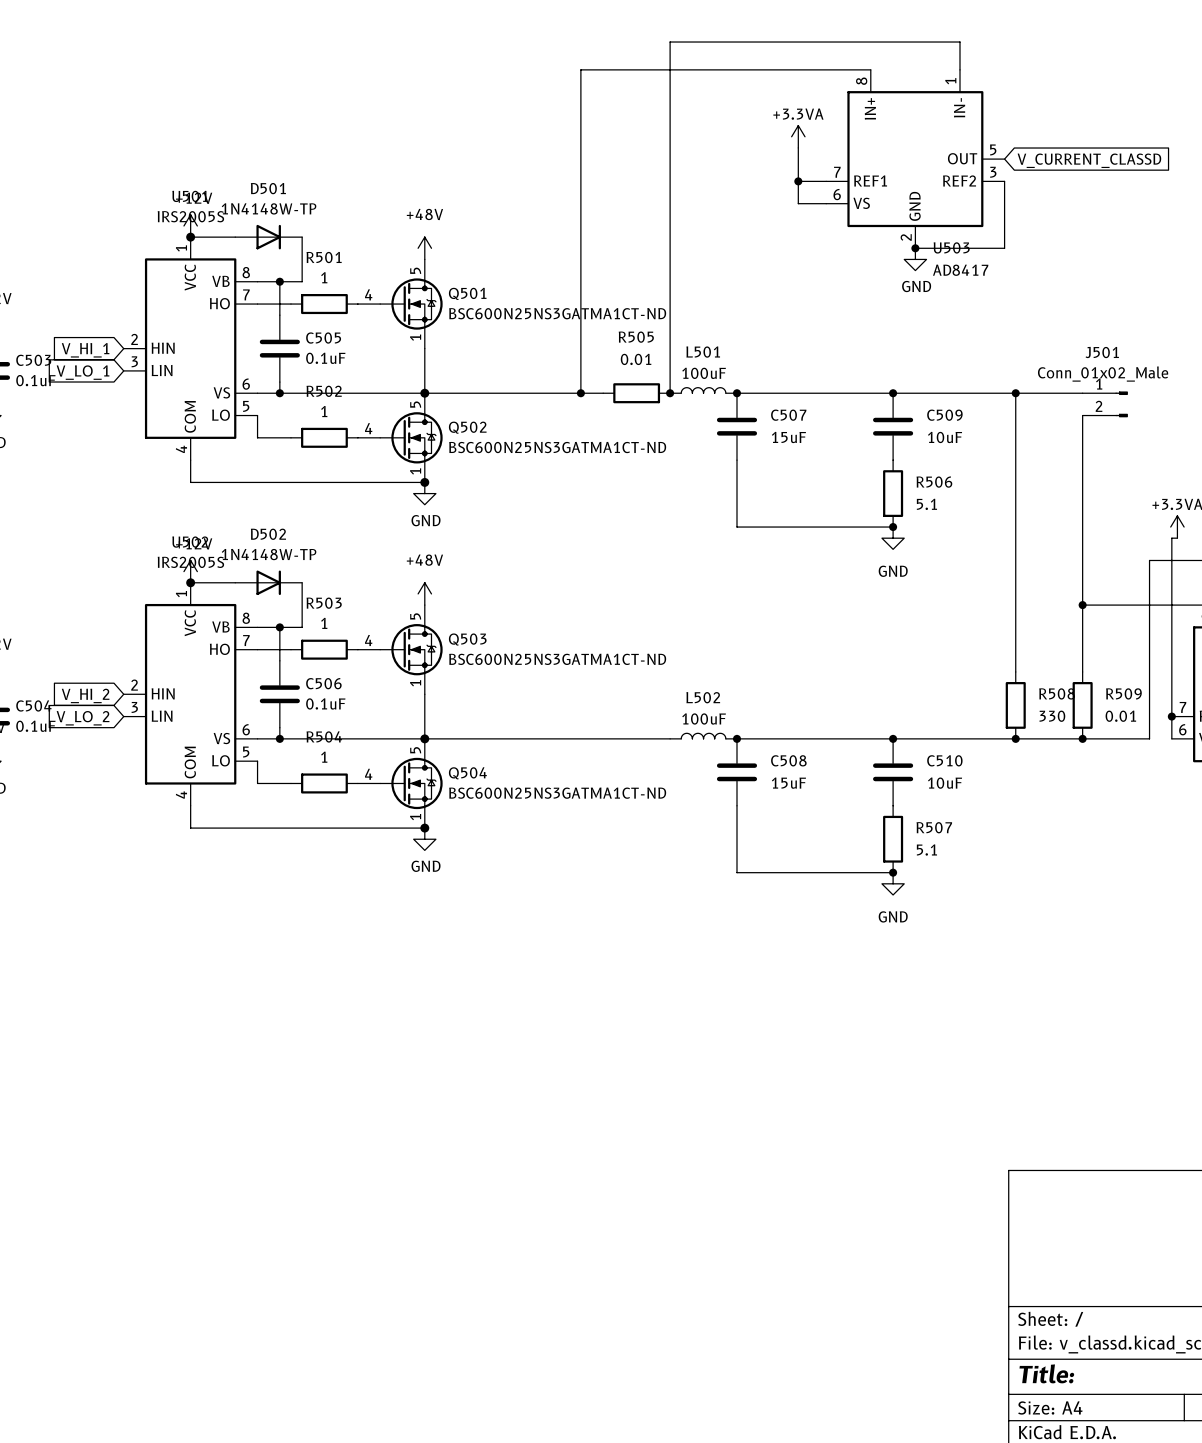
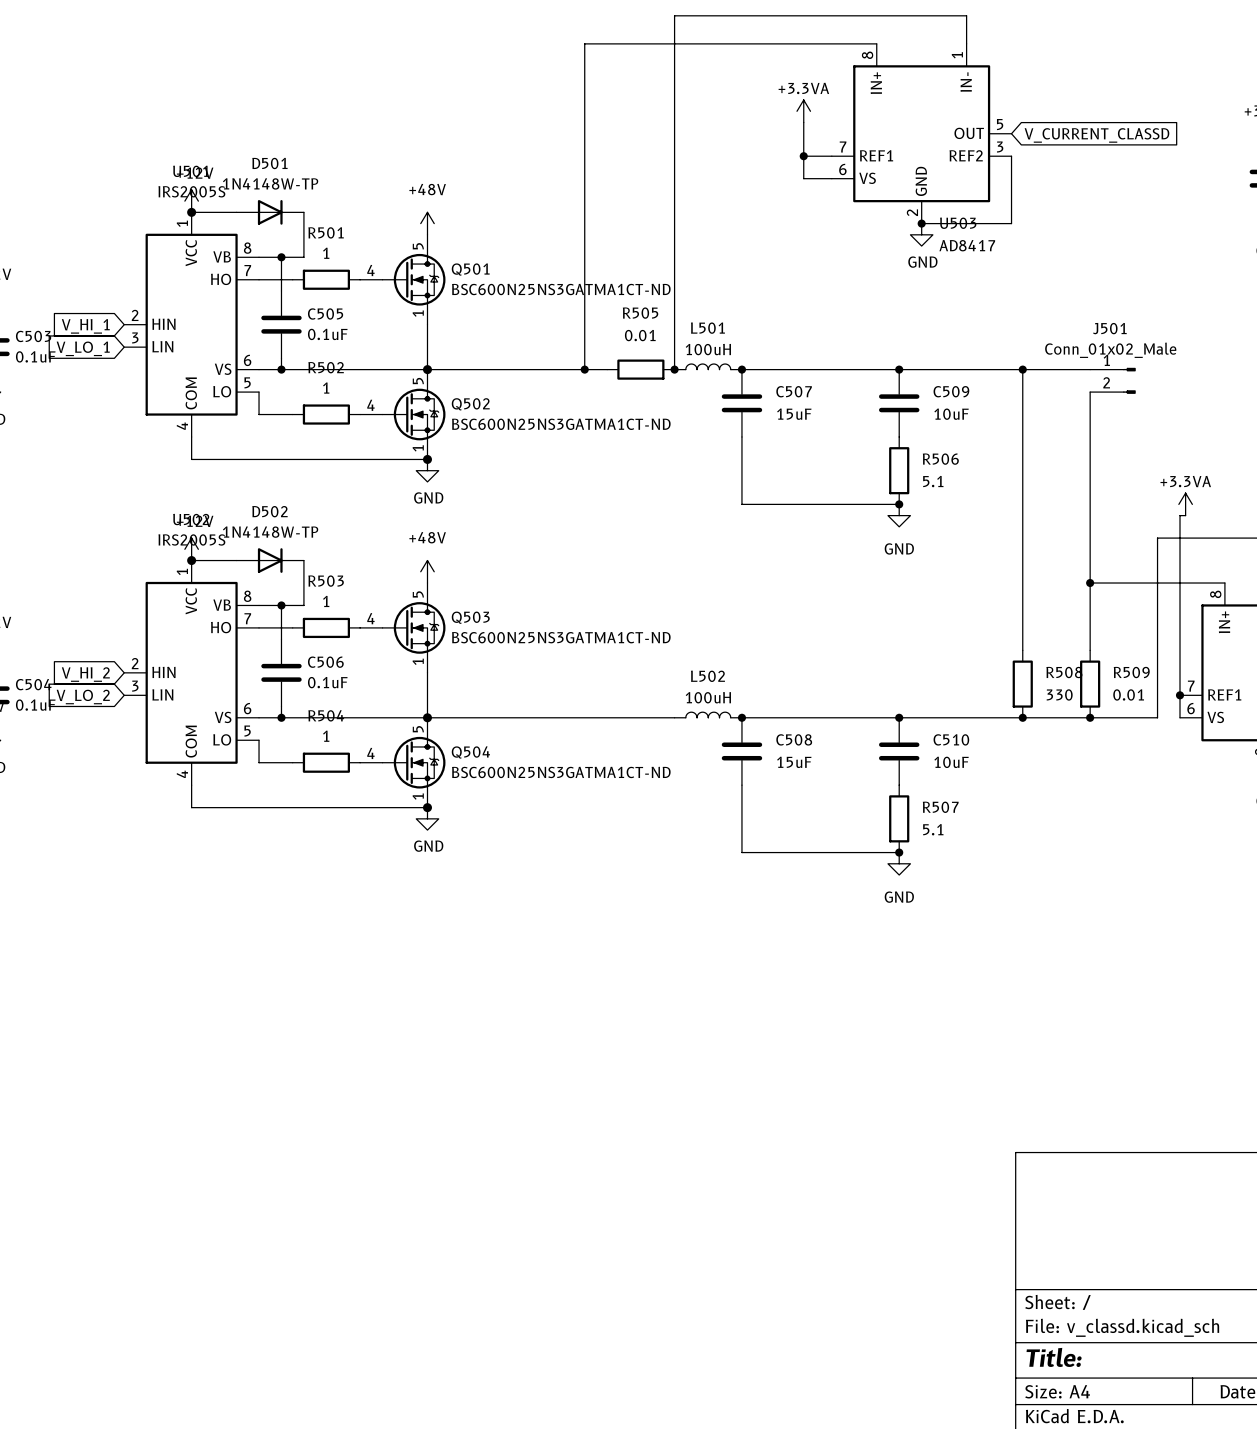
L501 value: 100uF (704, 373) -> 100uH (708, 349)
L502 value: 100uF (704, 718) -> 100uH (708, 697)

